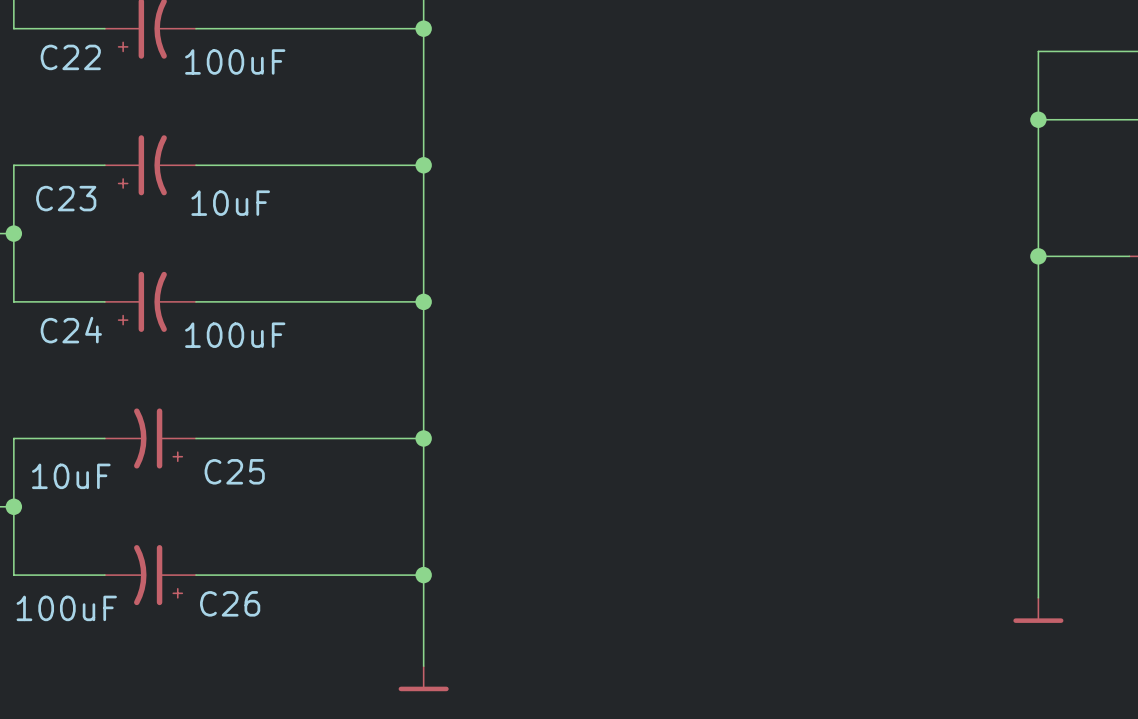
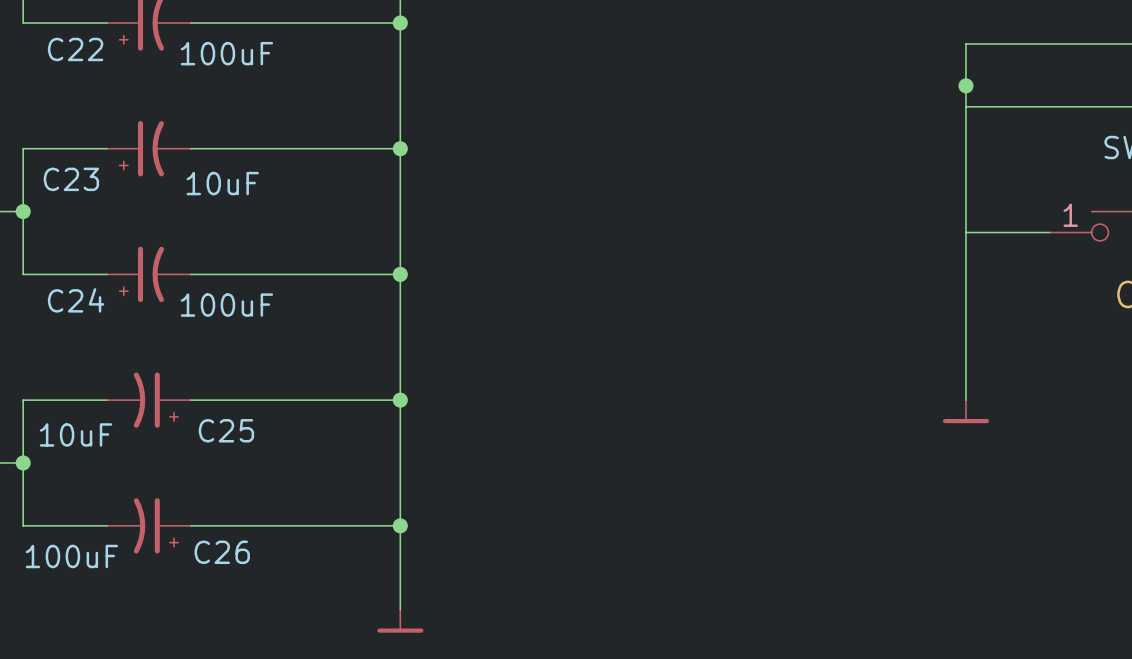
junction position: (1038, 119) -> (965, 85)
junction: (1038, 256) -> none
wire: (1038, 438) (1038, 597) -> none
power symbol position: (1038, 610) -> (965, 411)

